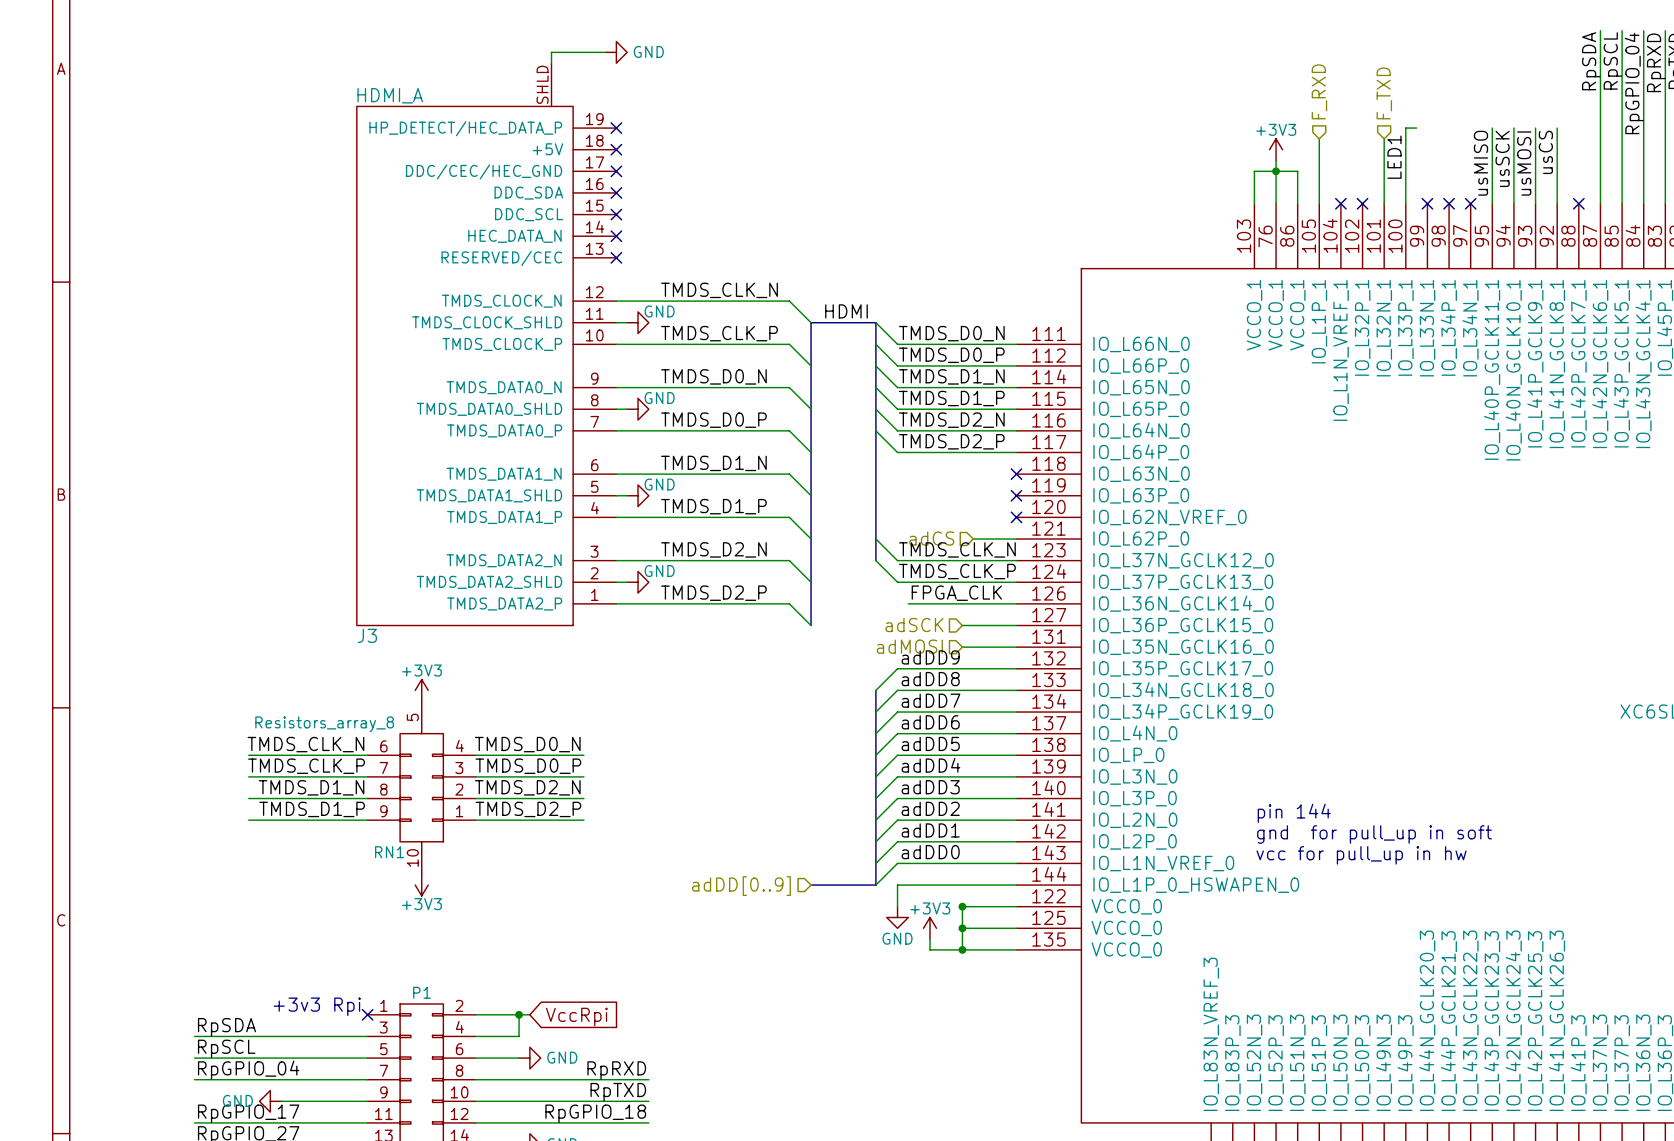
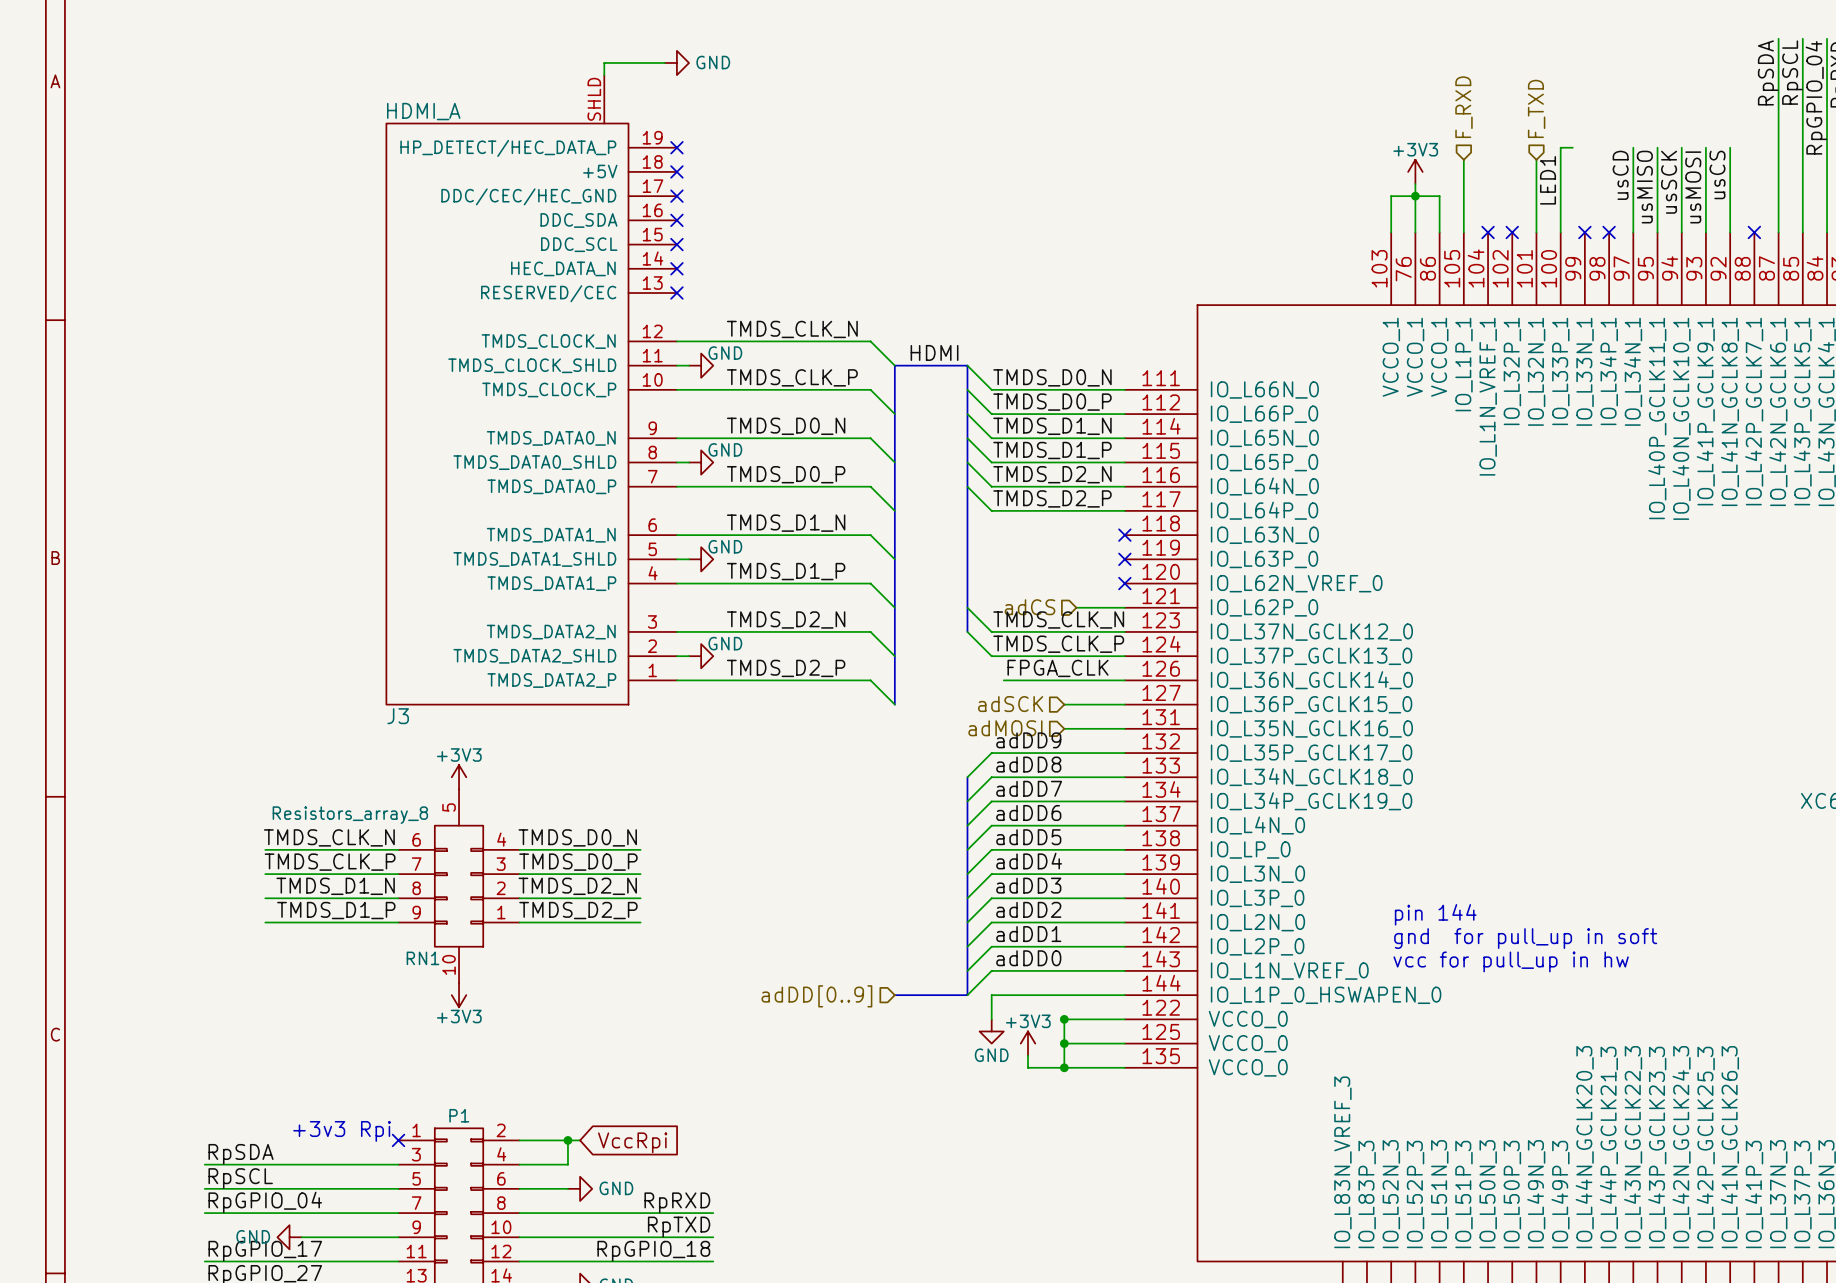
wire: none -> (1633, 147) (1633, 232)
label: none -> usCD (1620, 175)
no-connect mark: (1470, 203) -> none

